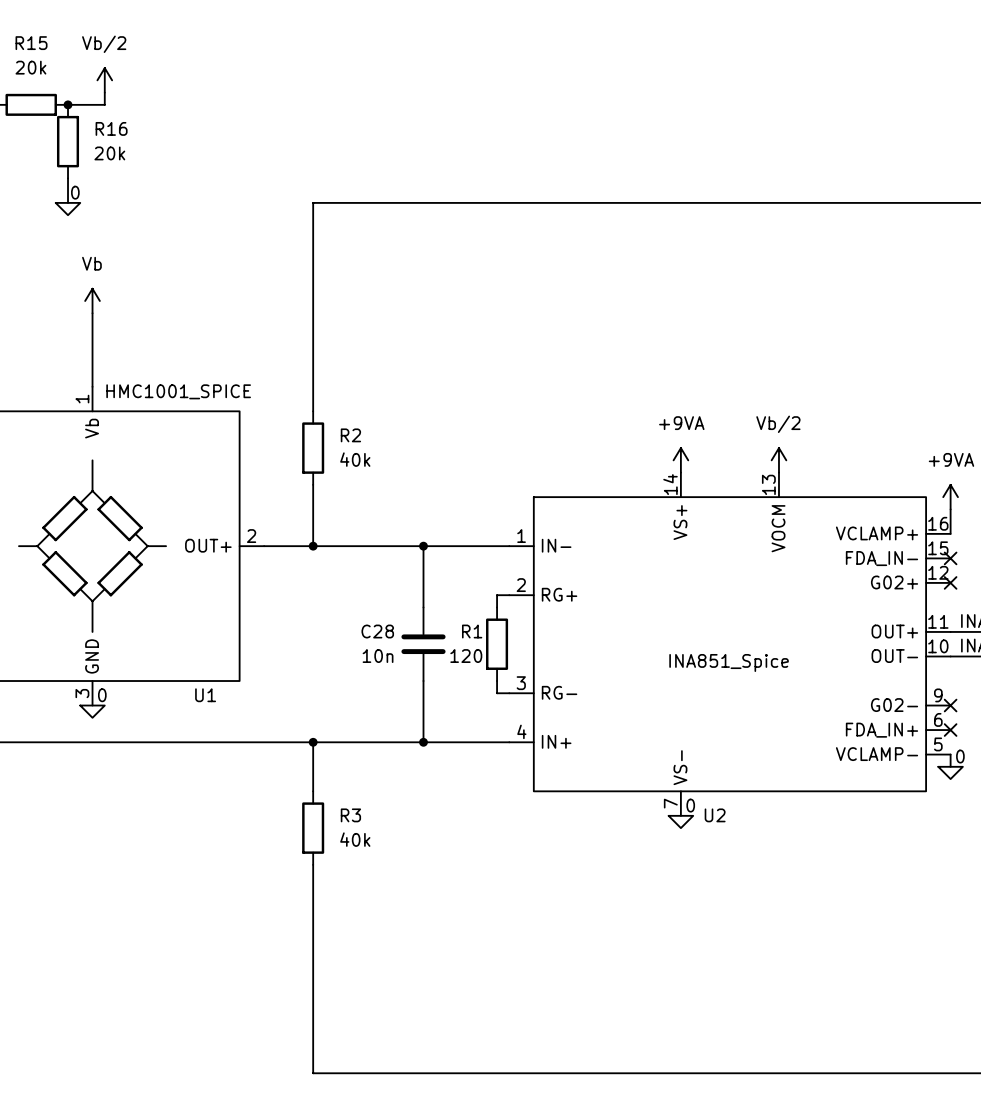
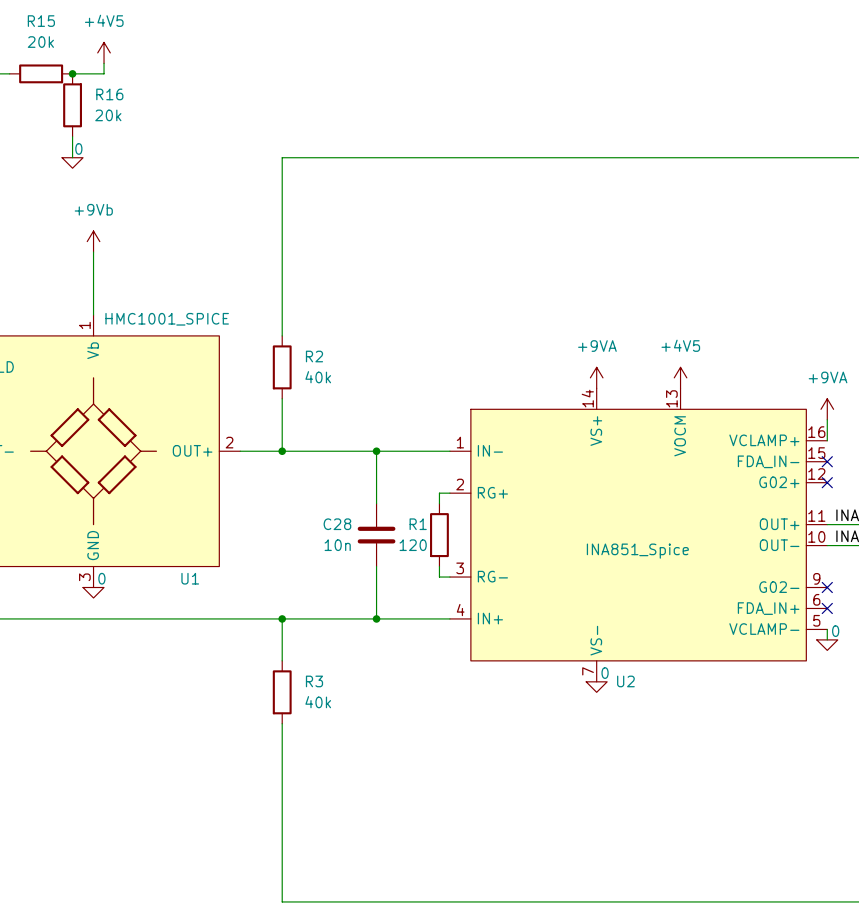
power symbol: Vb/2 (104, 80) -> +4V5 (104, 52)
power symbol: Vb (92, 301) -> +9Vb (93, 241)
power symbol: Vb/2 (778, 460) -> +4V5 (680, 377)

